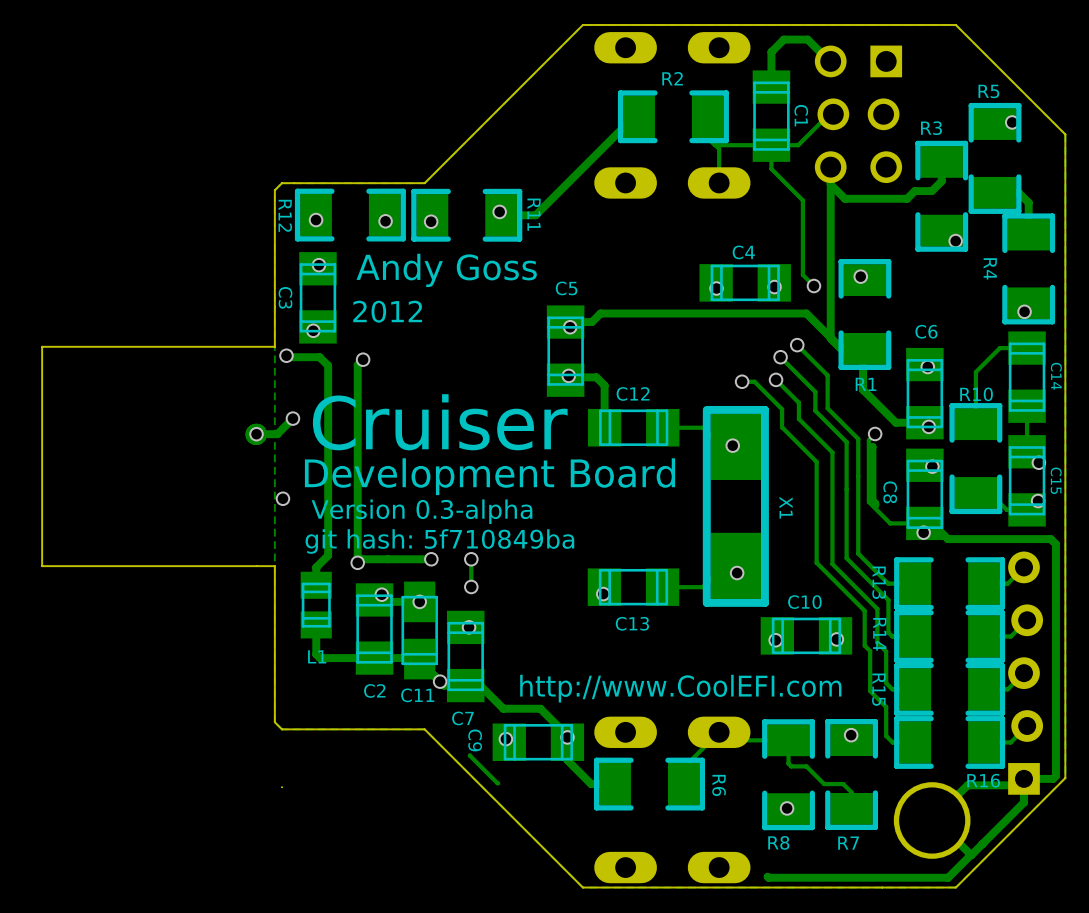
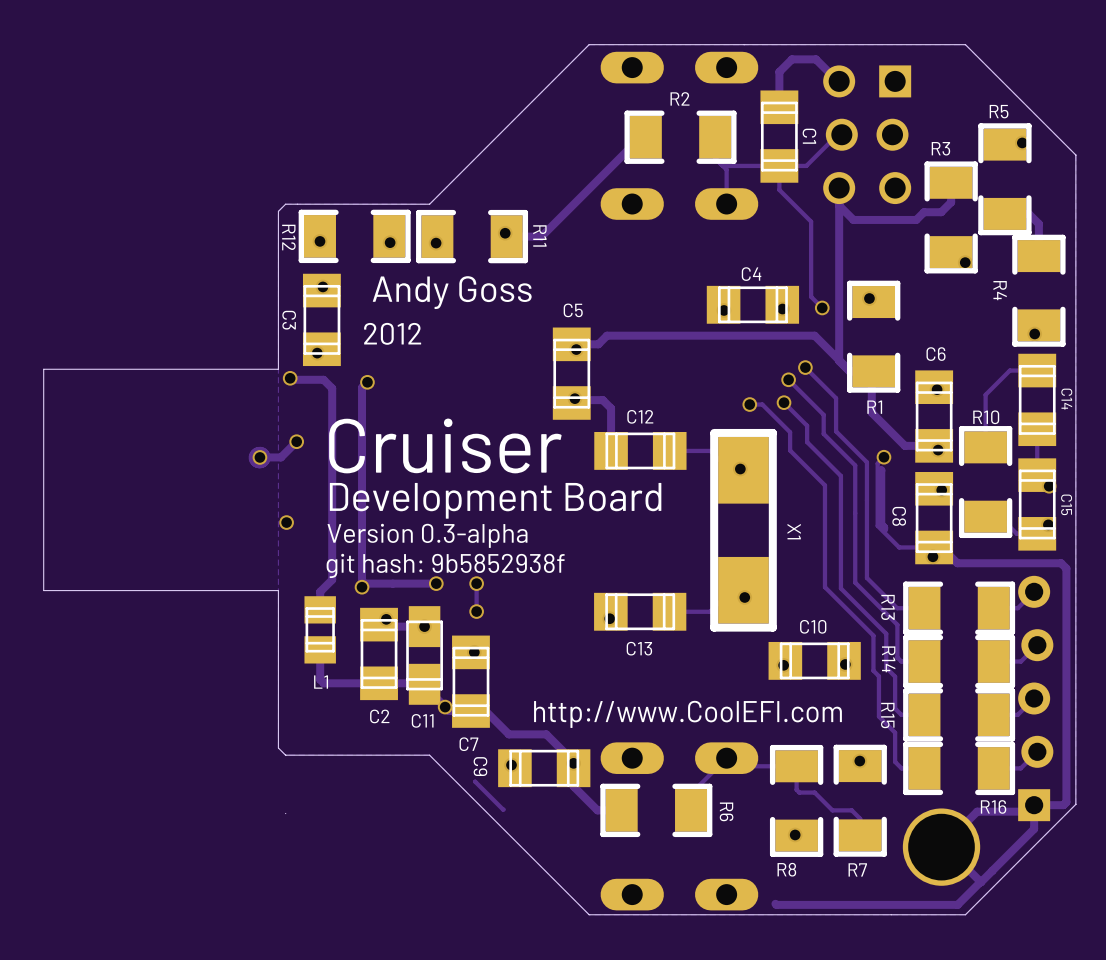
text: git hash: 5f710849ba (439, 541) -> git hash: 9b5852938f (445, 565)

